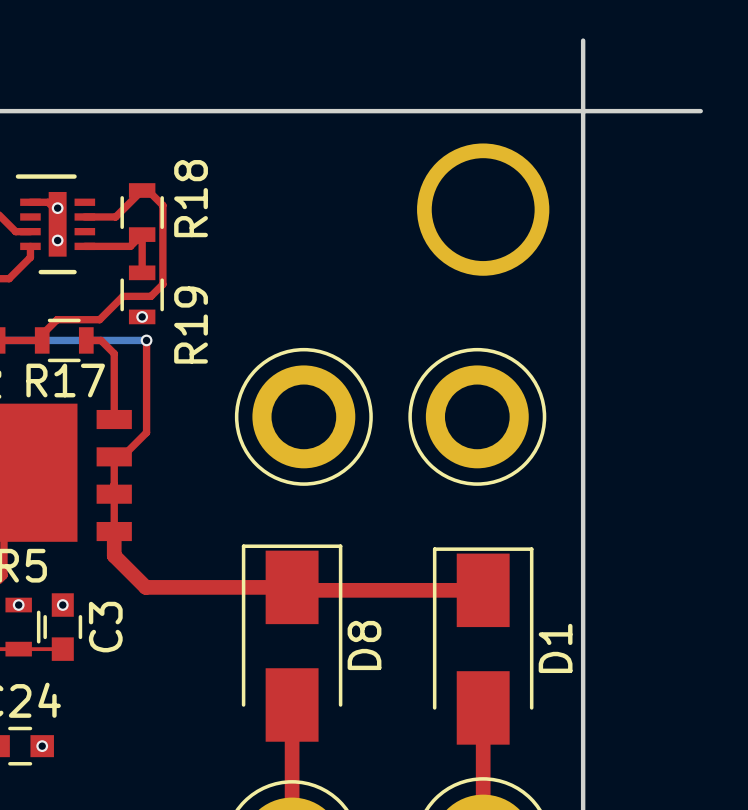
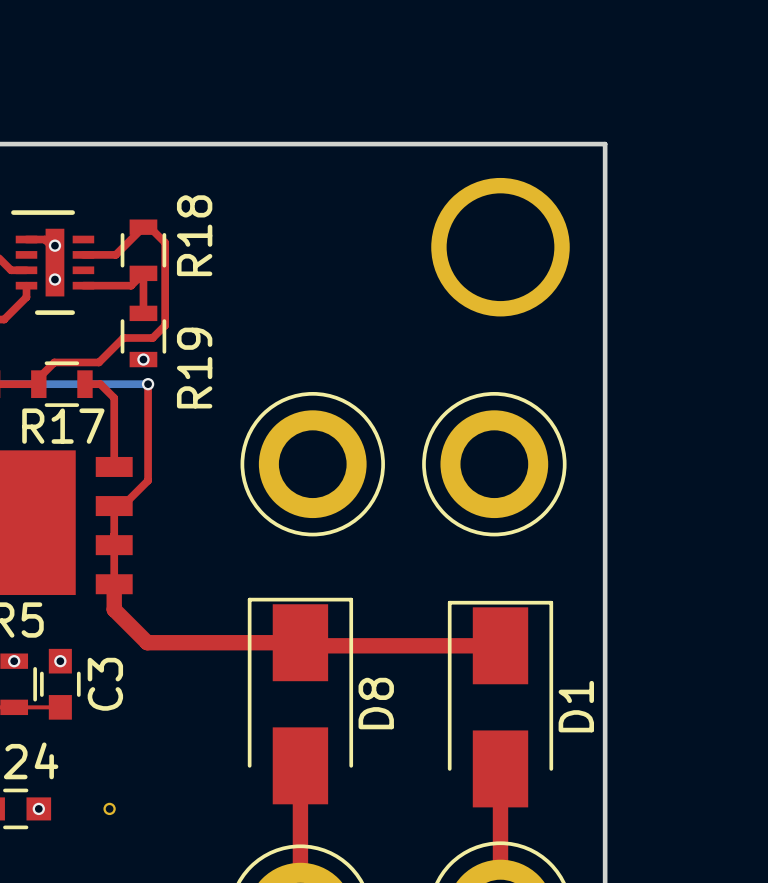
board edge: (583, 40) (583, 111) (700, 111) -> none
part: none -> (109, 808)

